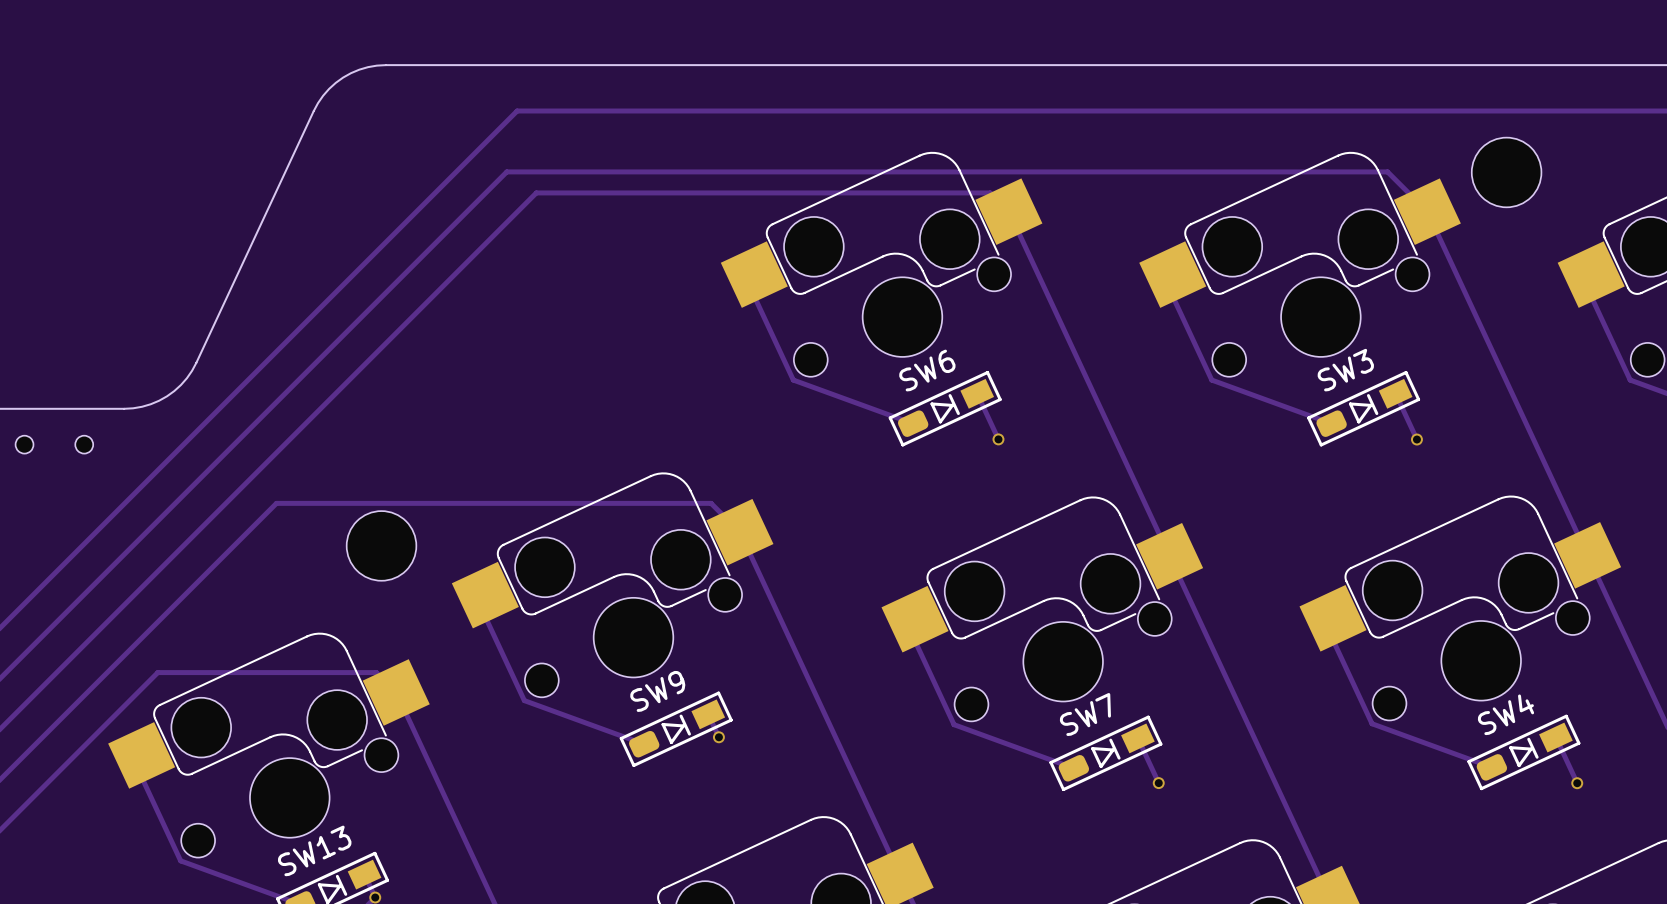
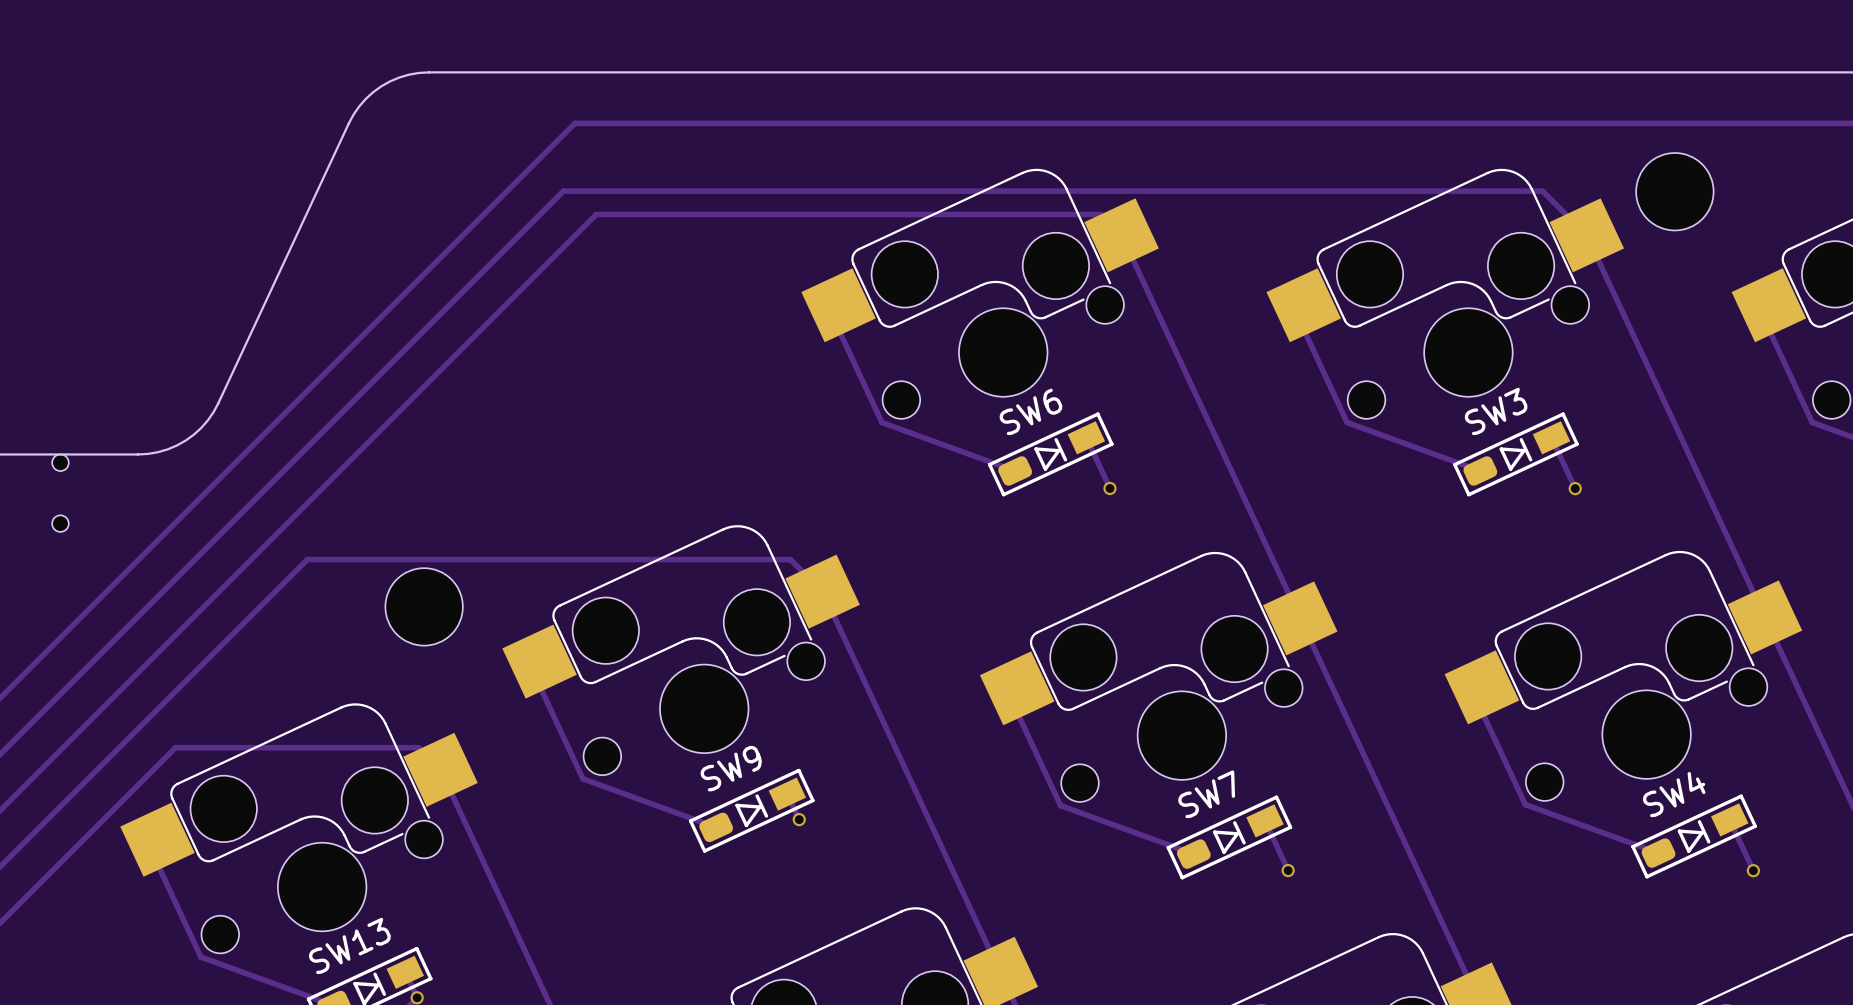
part footprint: [15, 435, 94, 454] -> [52, 454, 69, 532]

